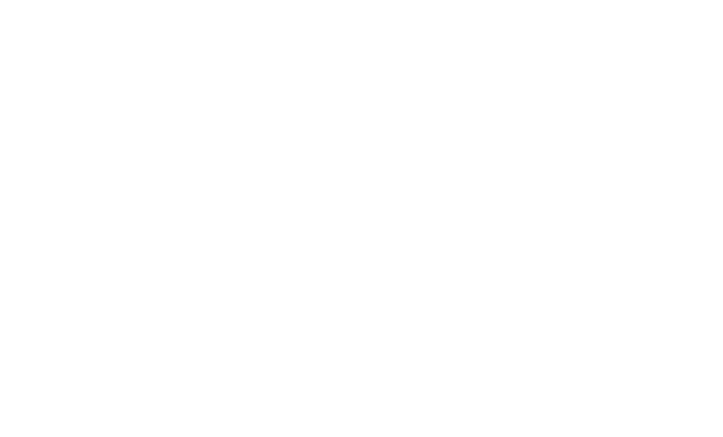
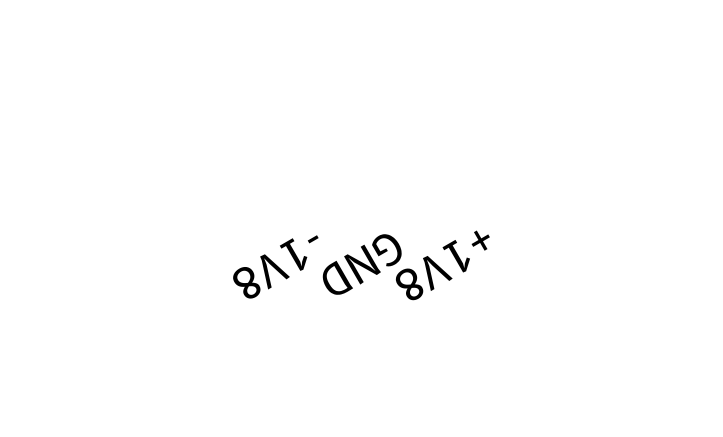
text: none -> GND (362, 264)
text: none -> +1V8 (442, 265)
text: none -> -1V8 (275, 266)

